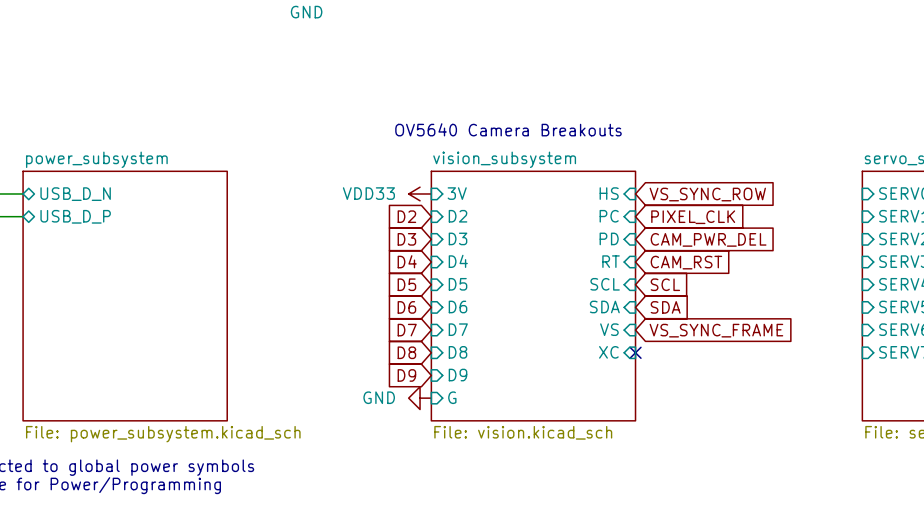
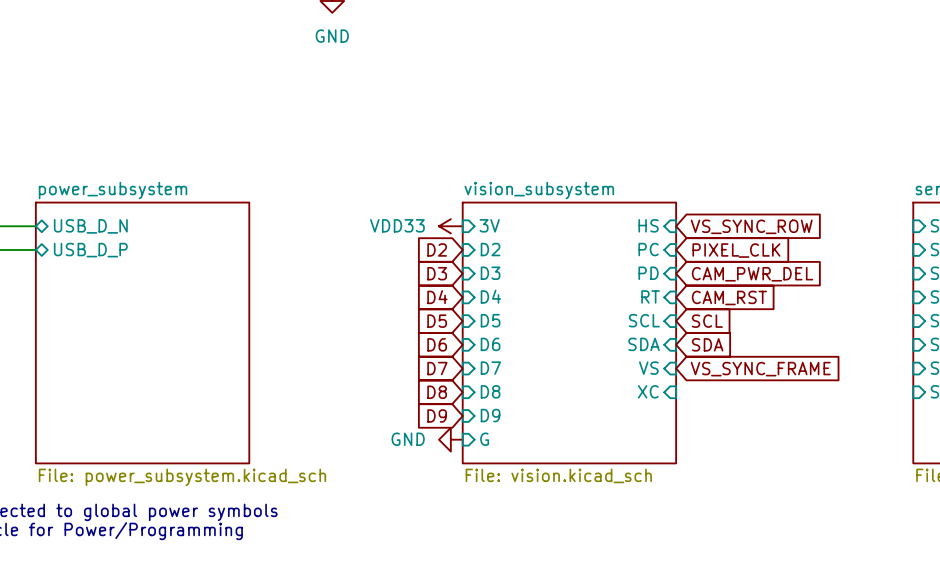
text: OV5640 Camera Breakouts (508, 129) -> none
no-connect mark: (635, 352) -> none

